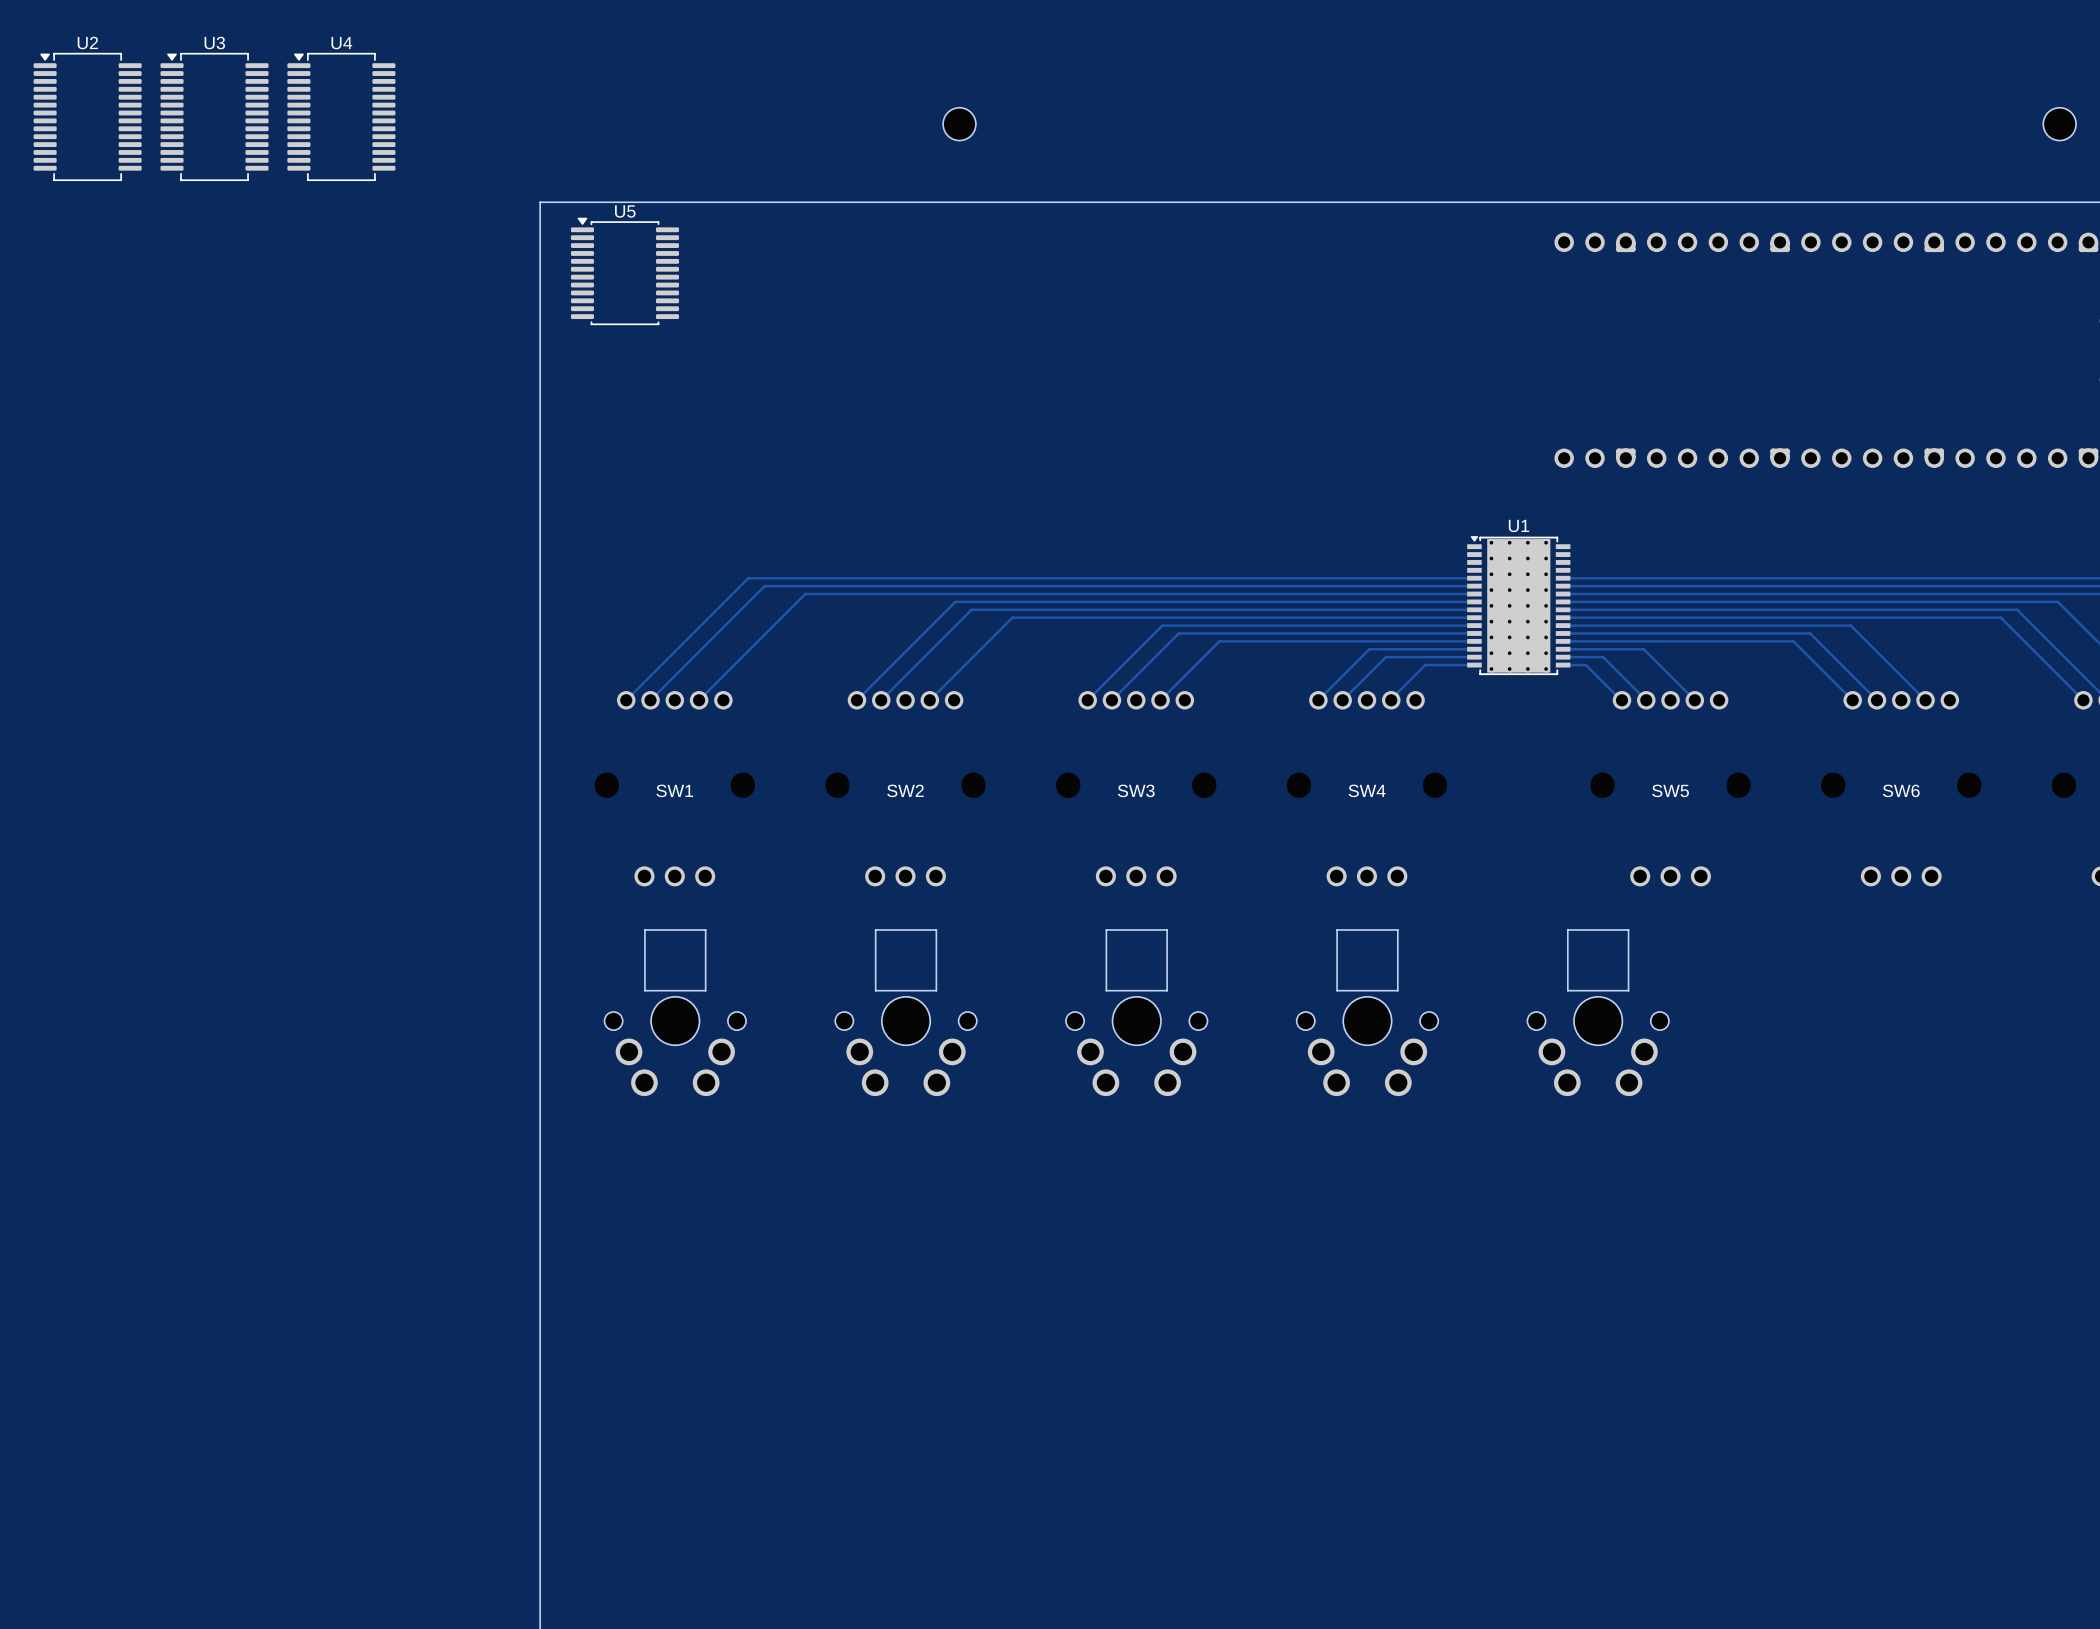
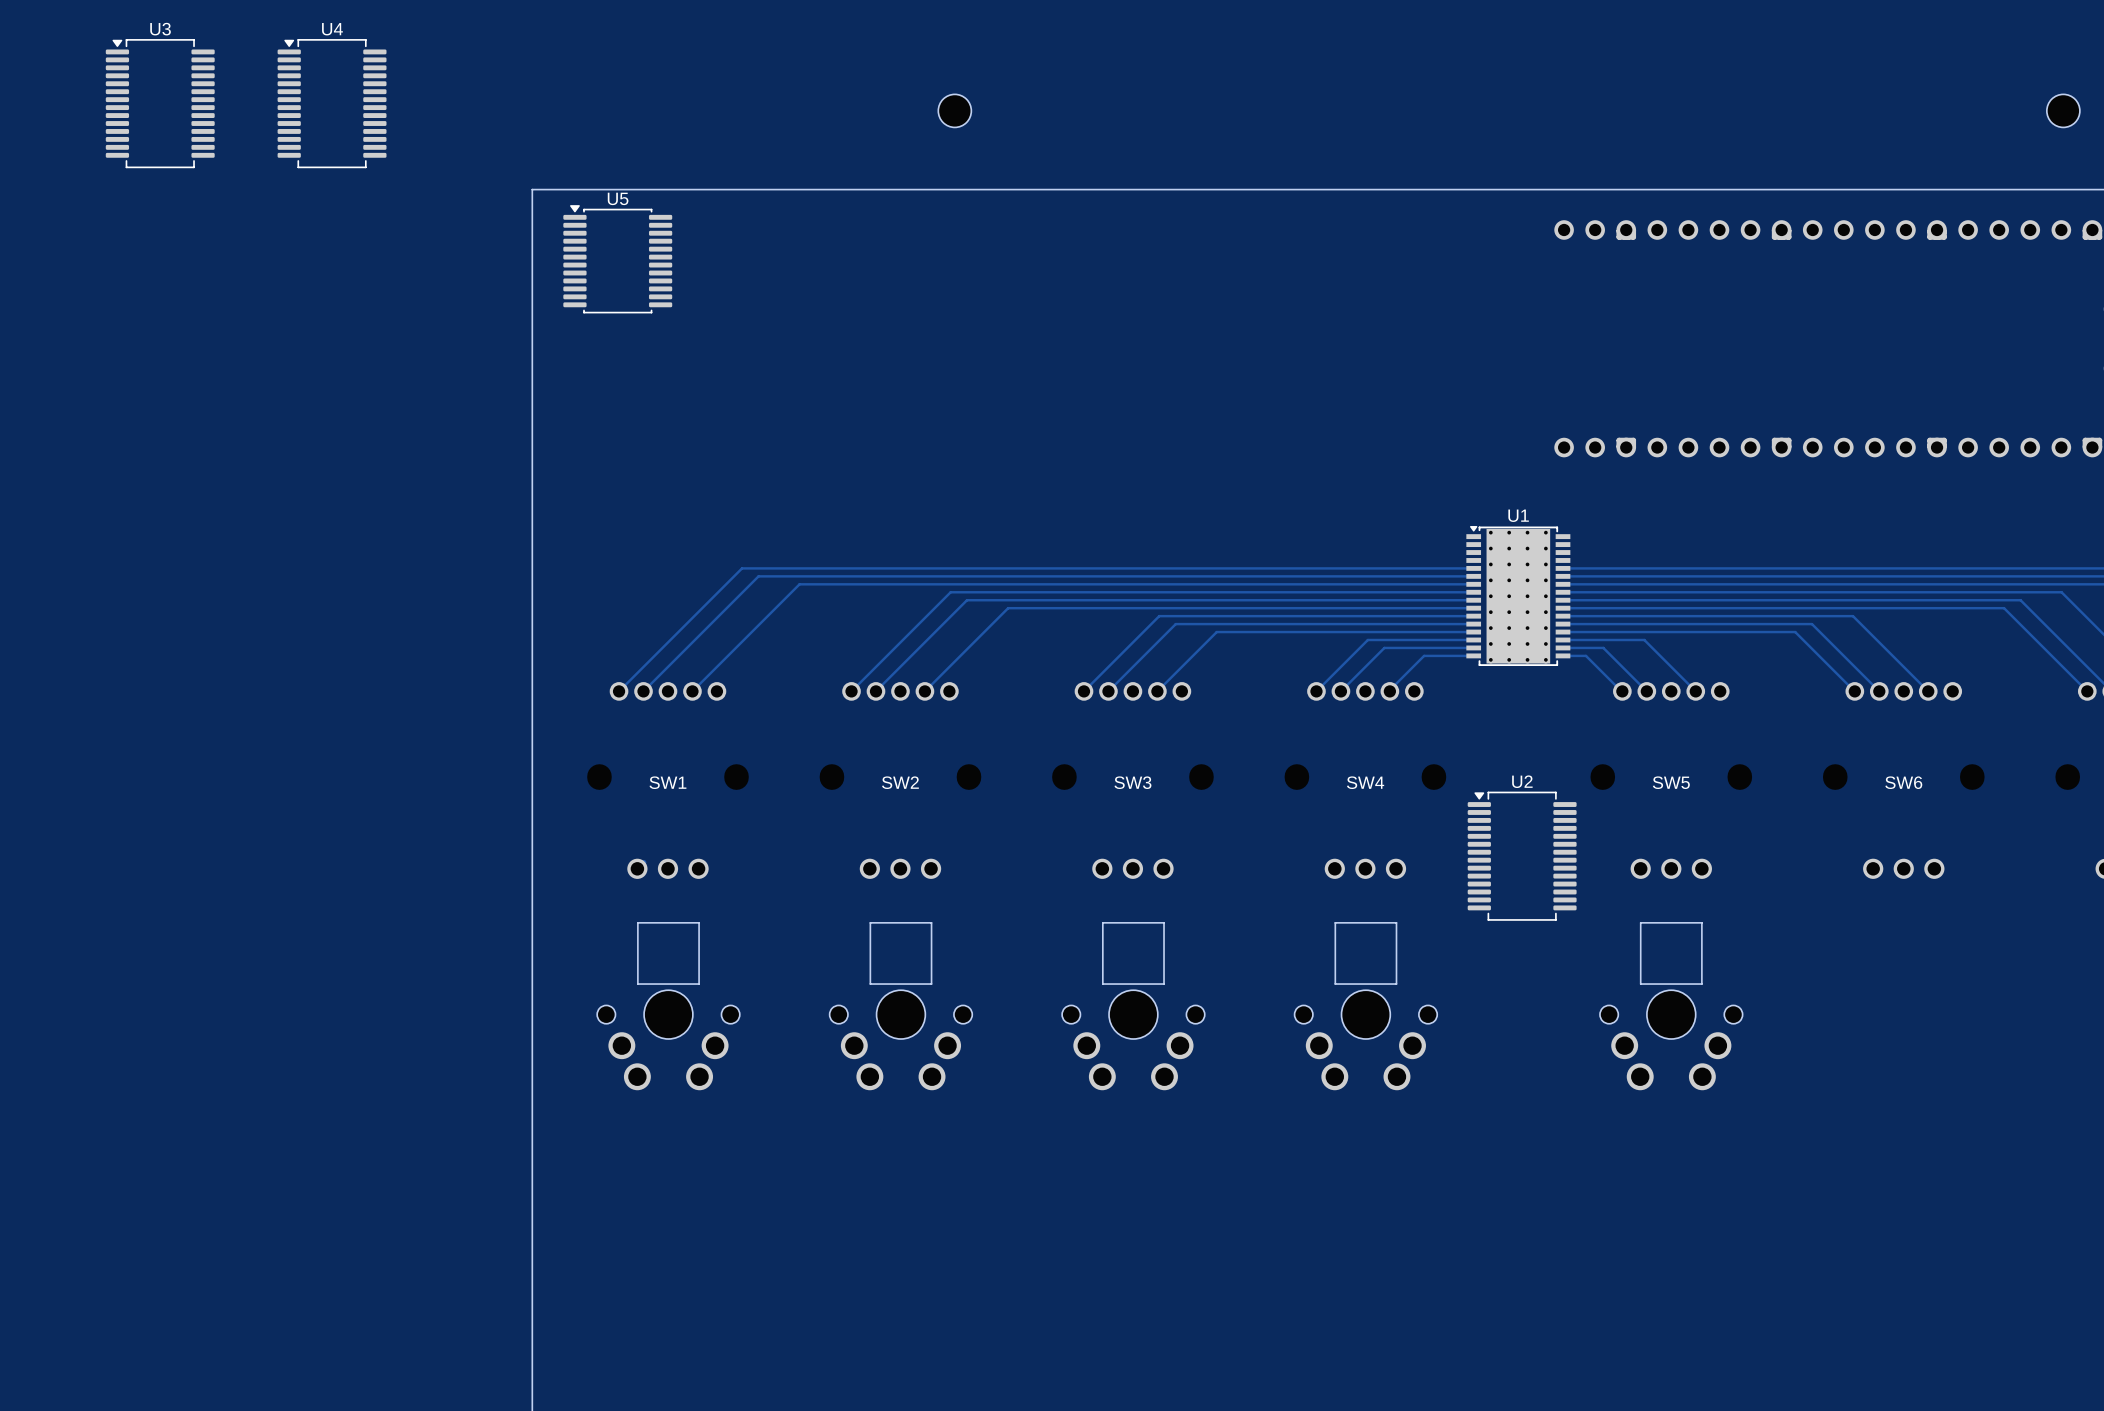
U2 position: (87, 116) -> (1522, 856)
U3 position: (214, 116) -> (160, 103)
part position: (1598, 1012) -> (1671, 1006)

